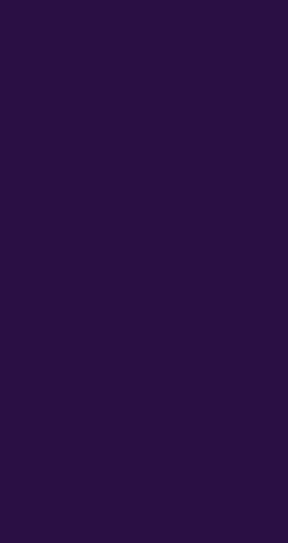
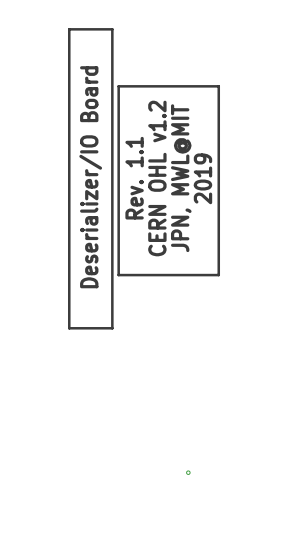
line: none -> (69, 29) (69, 328) (112, 328) (112, 29) (69, 29)
line: none -> (118, 86) (118, 275) (218, 275) (218, 86) (118, 86)
text: none -> Deserializer/IO Board (90, 177)
text: none -> Rev. 1.1 (134, 178)
text: none -> CERN OHL v1.2 (157, 178)
text: none -> JPN, MWL@MIT (181, 178)
text: none -> 2019 (202, 178)
via: none -> (188, 472)

